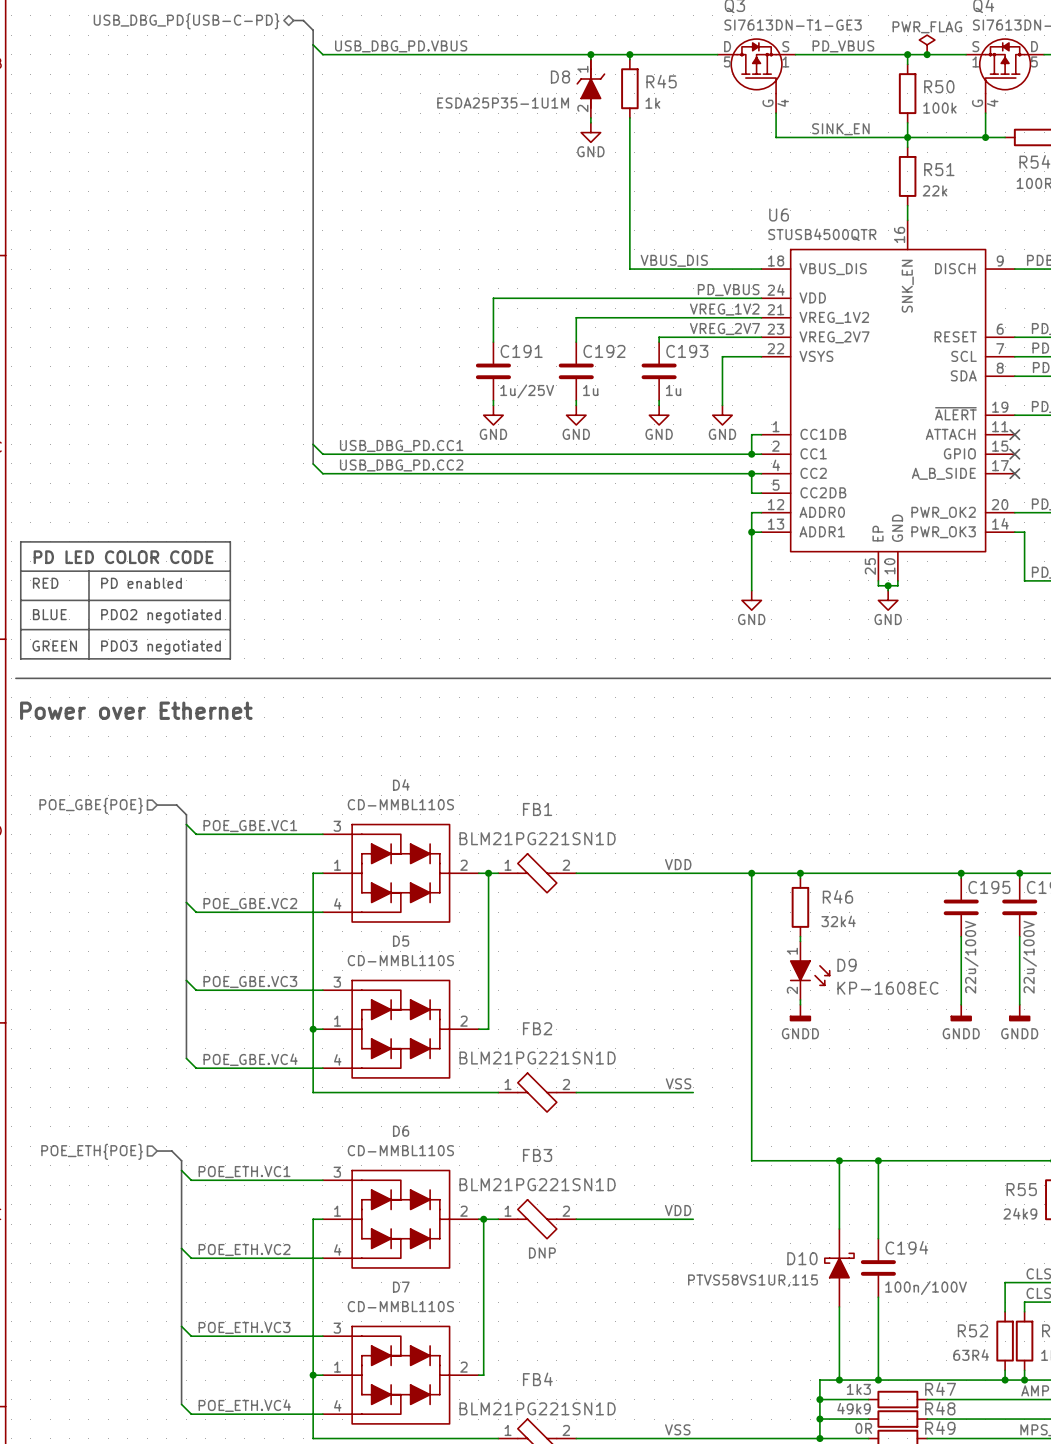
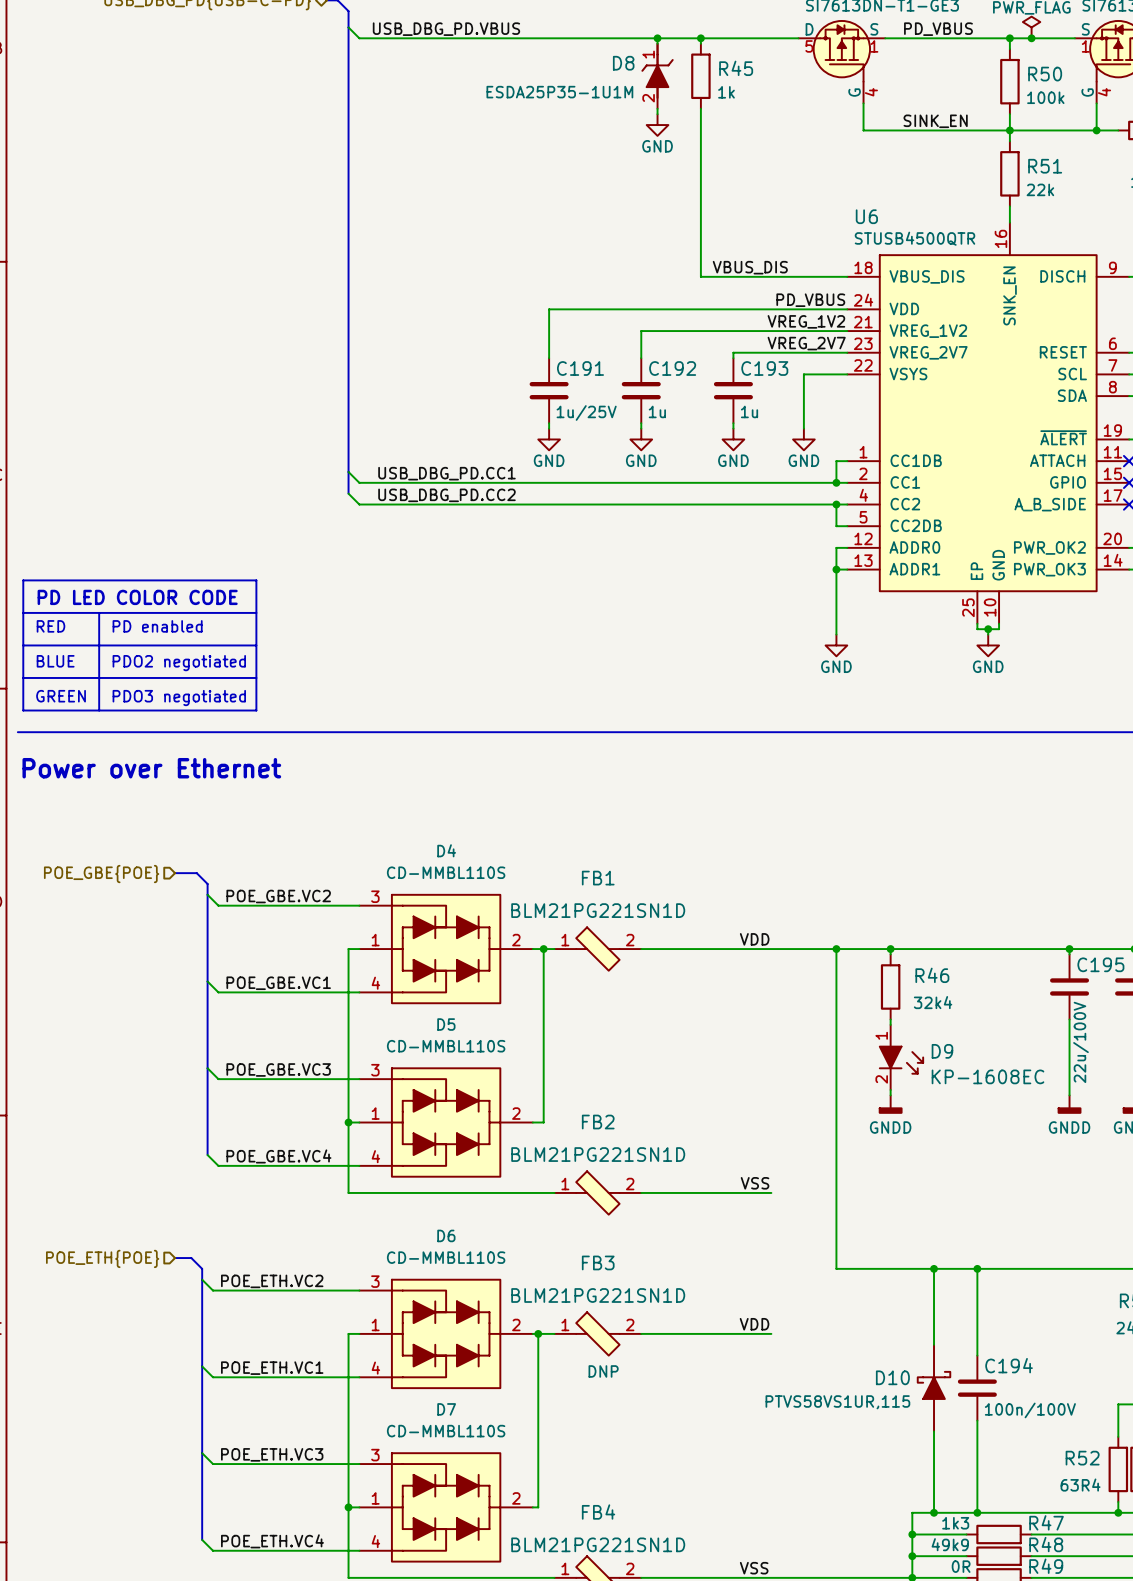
label: POE_GBE.VC1 (250, 826) -> POE_GBE.VC2 (278, 896)
label: POE_GBE.VC2 (250, 904) -> POE_GBE.VC1 (278, 983)
label: POE_ETH.VC1 (244, 1172) -> POE_ETH.VC2 (272, 1281)
label: POE_ETH.VC2 (244, 1249) -> POE_ETH.VC1 (272, 1368)

